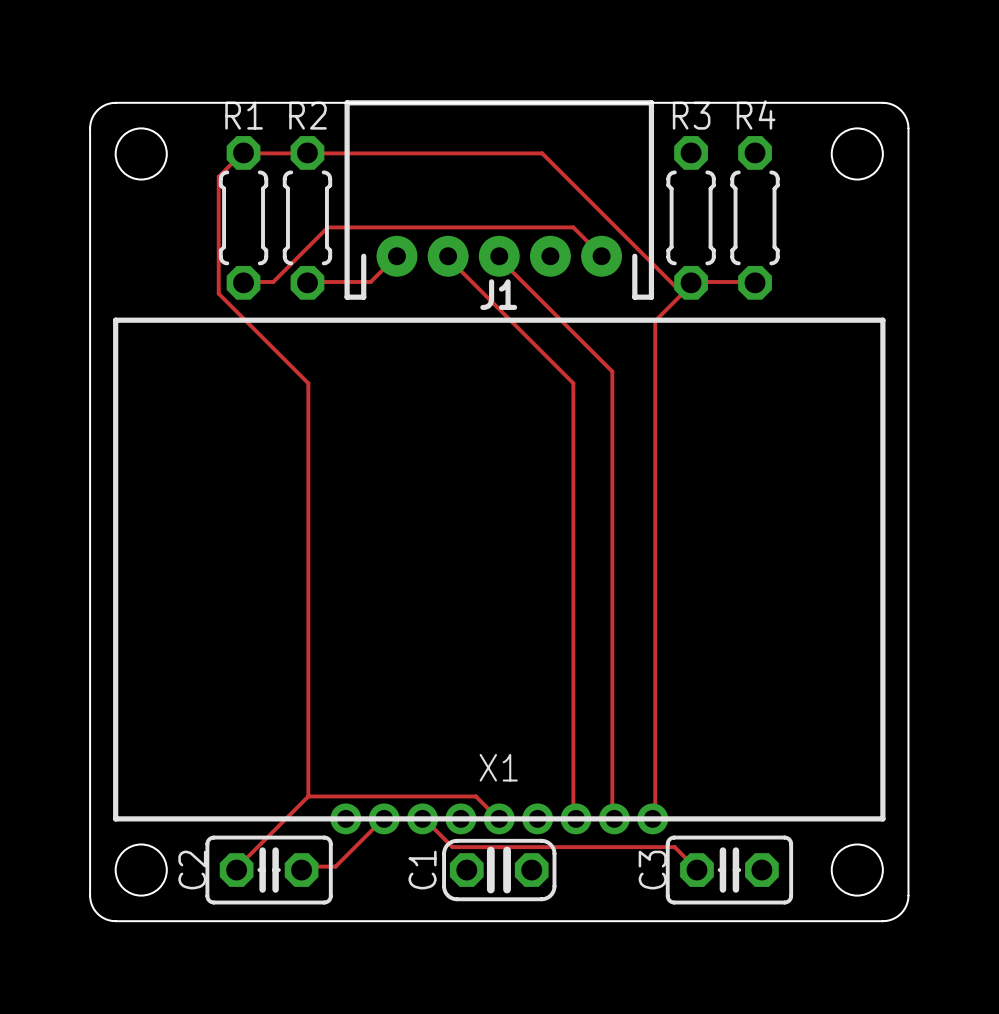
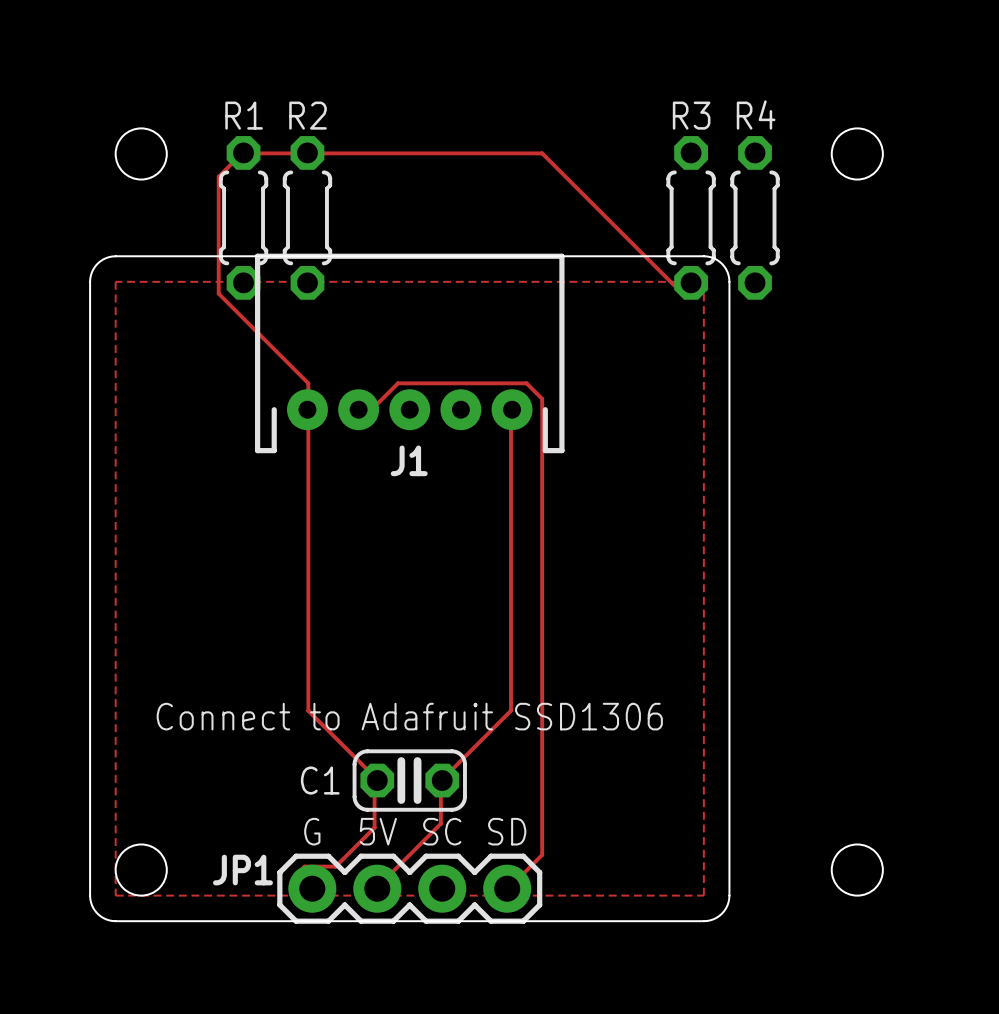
J1 position: (499, 199) -> (409, 353)
track: (396, 256) (370, 282) (307, 282) -> none
track: (448, 256) (573, 383) (573, 815) (576, 818) -> none
track: (499, 256) (499, 258) (612, 371) (612, 815) (614, 818) -> none
track: (601, 256) (573, 227) (327, 227) (273, 282) (243, 282) -> none
board edge: (90, 281) (90, 125) (95, 112) (109, 103) (882, 102) (892, 104) (900, 110) (906, 118) (908, 128) (907, 902) (898, 915) (886, 920) (703, 921) -> (90, 281) (92, 272) (97, 263) (105, 258) (115, 256) (703, 256) (713, 258) (721, 263) (727, 272) (729, 281) (729, 895) (727, 905) (721, 913) (713, 919) (703, 921)
zone outline: none -> (115, 281) (703, 281) (703, 895) (115, 895) (115, 281)
track: (755, 282) (691, 282) (690, 285) (655, 320) (655, 815) (652, 818) -> none
J1 name position: J1 (498, 294) -> J1 (409, 460)
track: none -> (358, 409) (359, 406) (374, 406) (397, 383) (526, 383) (542, 398) (542, 854) (507, 888)
track: none -> (512, 409) (511, 710) (440, 780) (440, 823) (377, 888)
X1: (499, 575) -> none
track: (308, 710) (308, 796) -> (308, 710) (377, 780) (374, 780) (374, 827)
text: none -> Connect to Adafruit SSD1306 (409, 716)
track: (308, 796) (475, 796) (499, 818) -> none
track: (308, 796) (236, 870) -> none
track: (422, 818) (452, 847) (674, 847) (696, 870) -> none
text: none -> G (312, 831)
text: none -> 5V (378, 831)
text: none -> SC (442, 831)
text: none -> SD (507, 831)
C2: (269, 870) -> none
C1 name rotation: 0° (422, 870) -> 90° clockwise (320, 780)
C1 position: (499, 870) -> (409, 780)
C3: (729, 870) -> none
JP1: none -> (409, 888)

